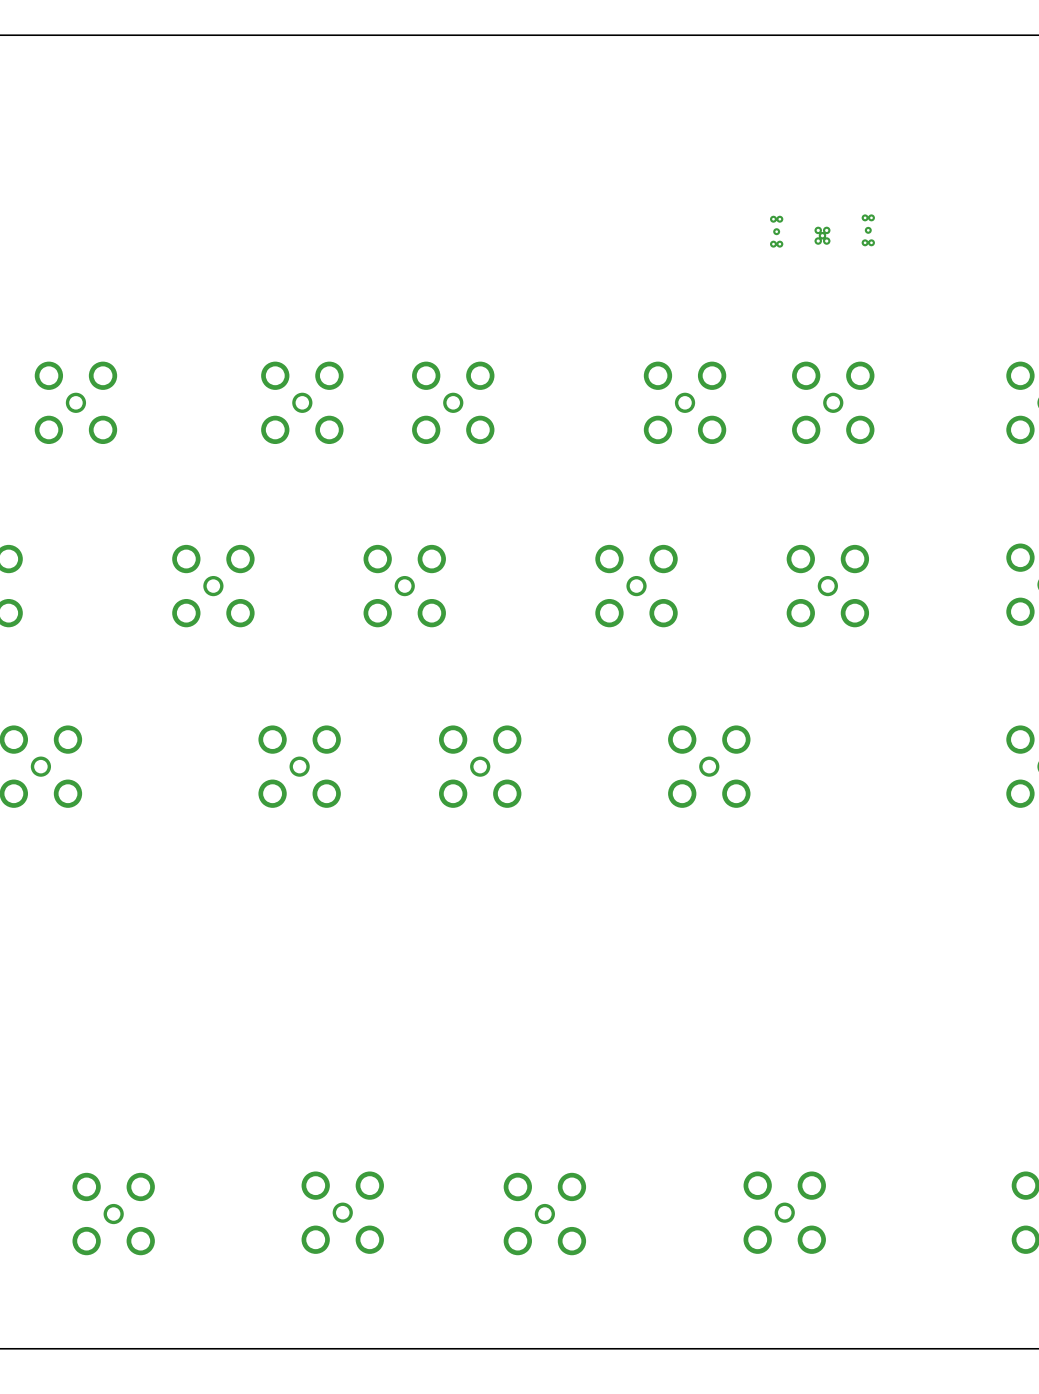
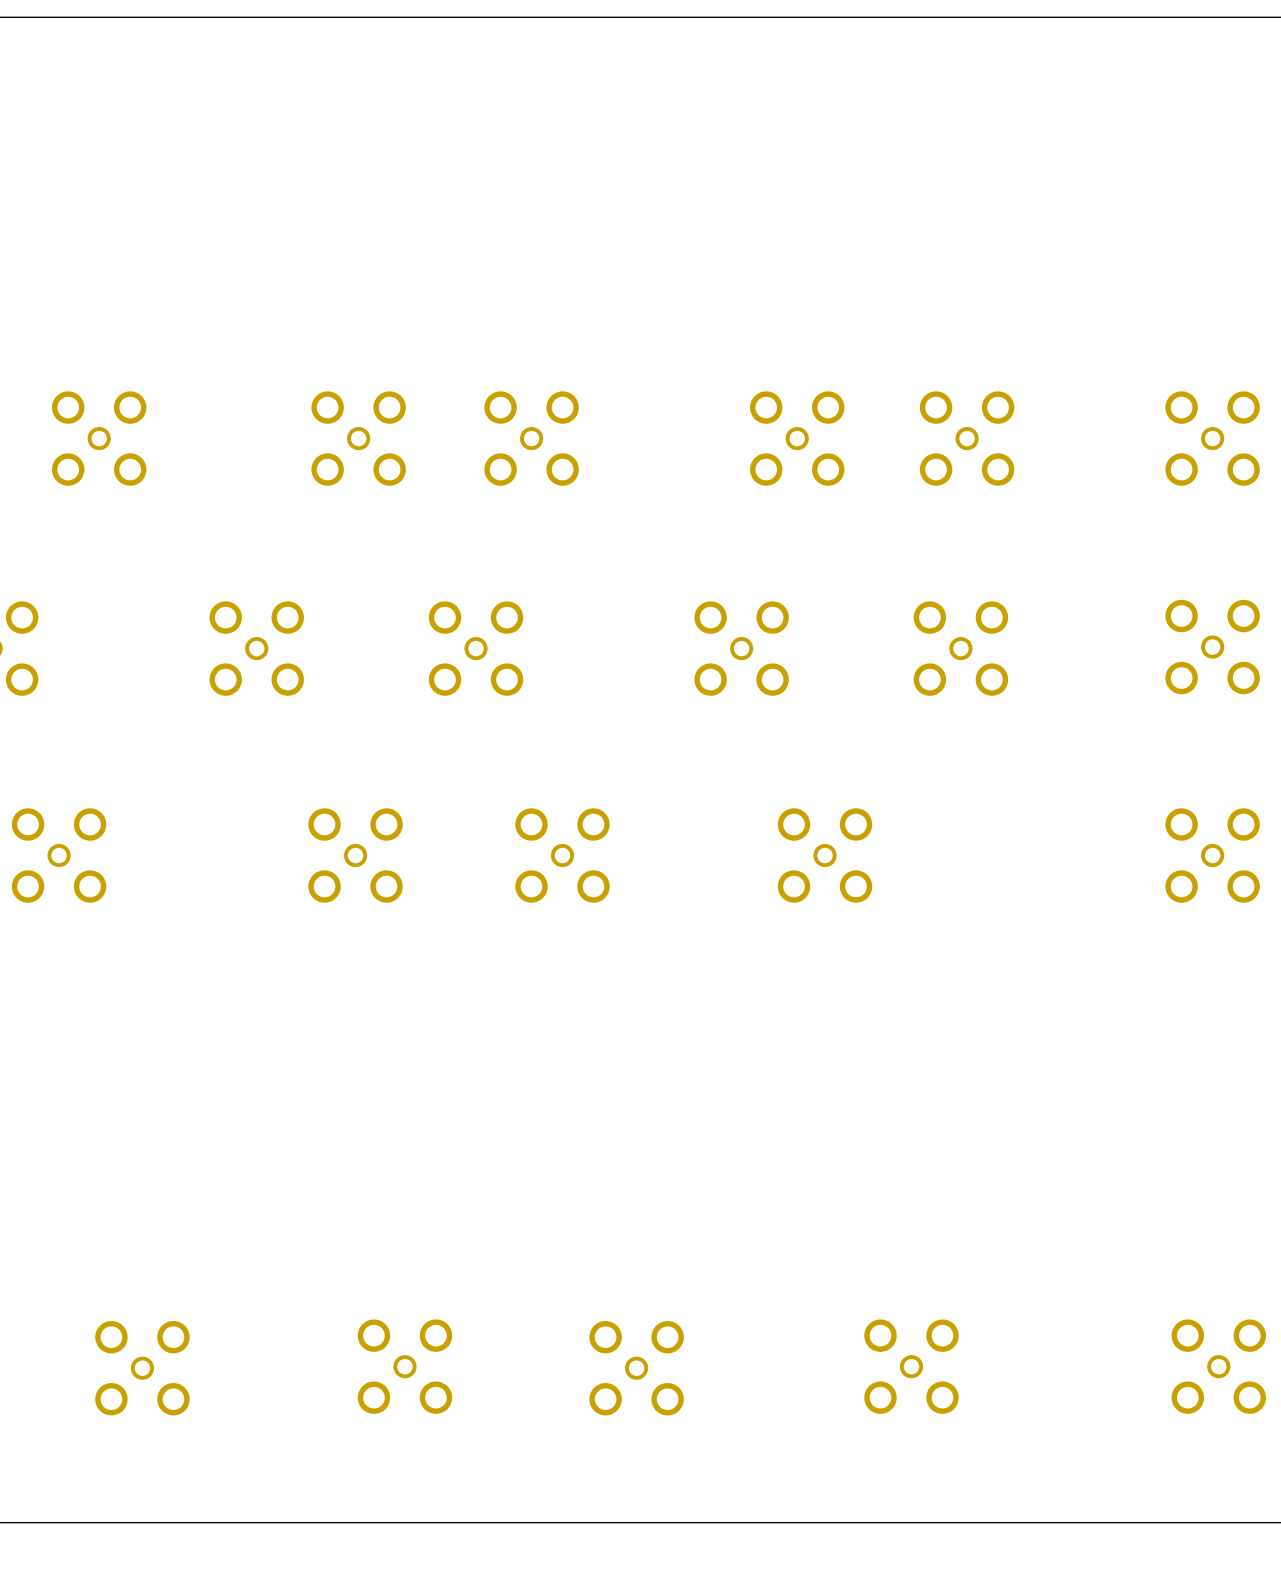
part: (868, 230) -> none
part: (776, 231) -> none
part: (822, 235) -> none

